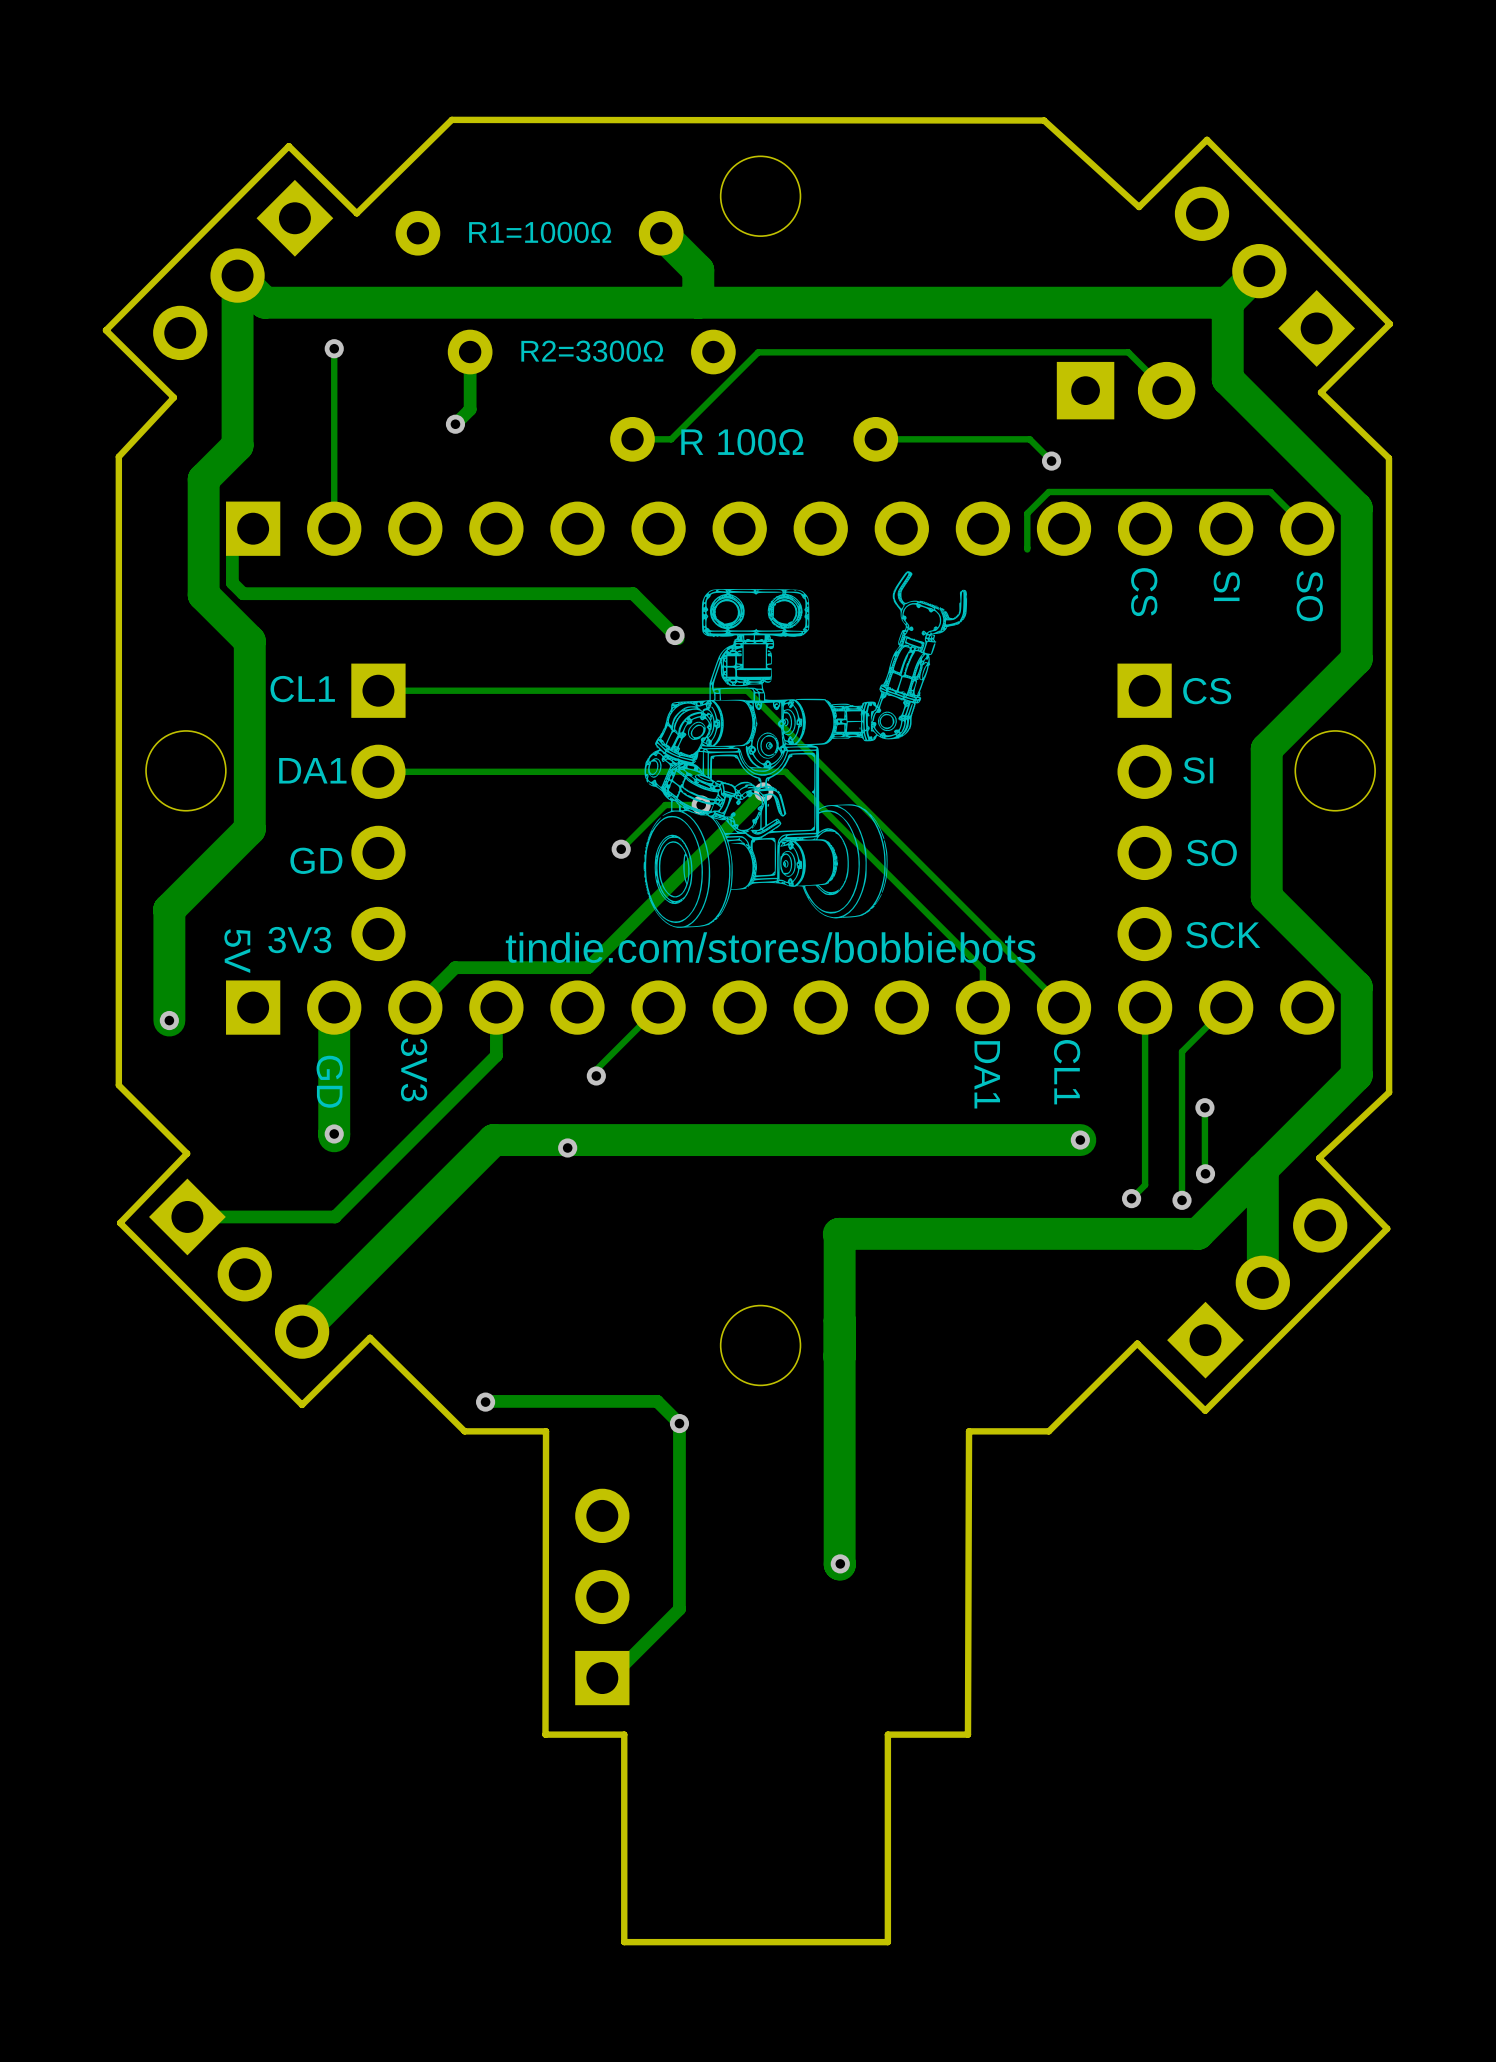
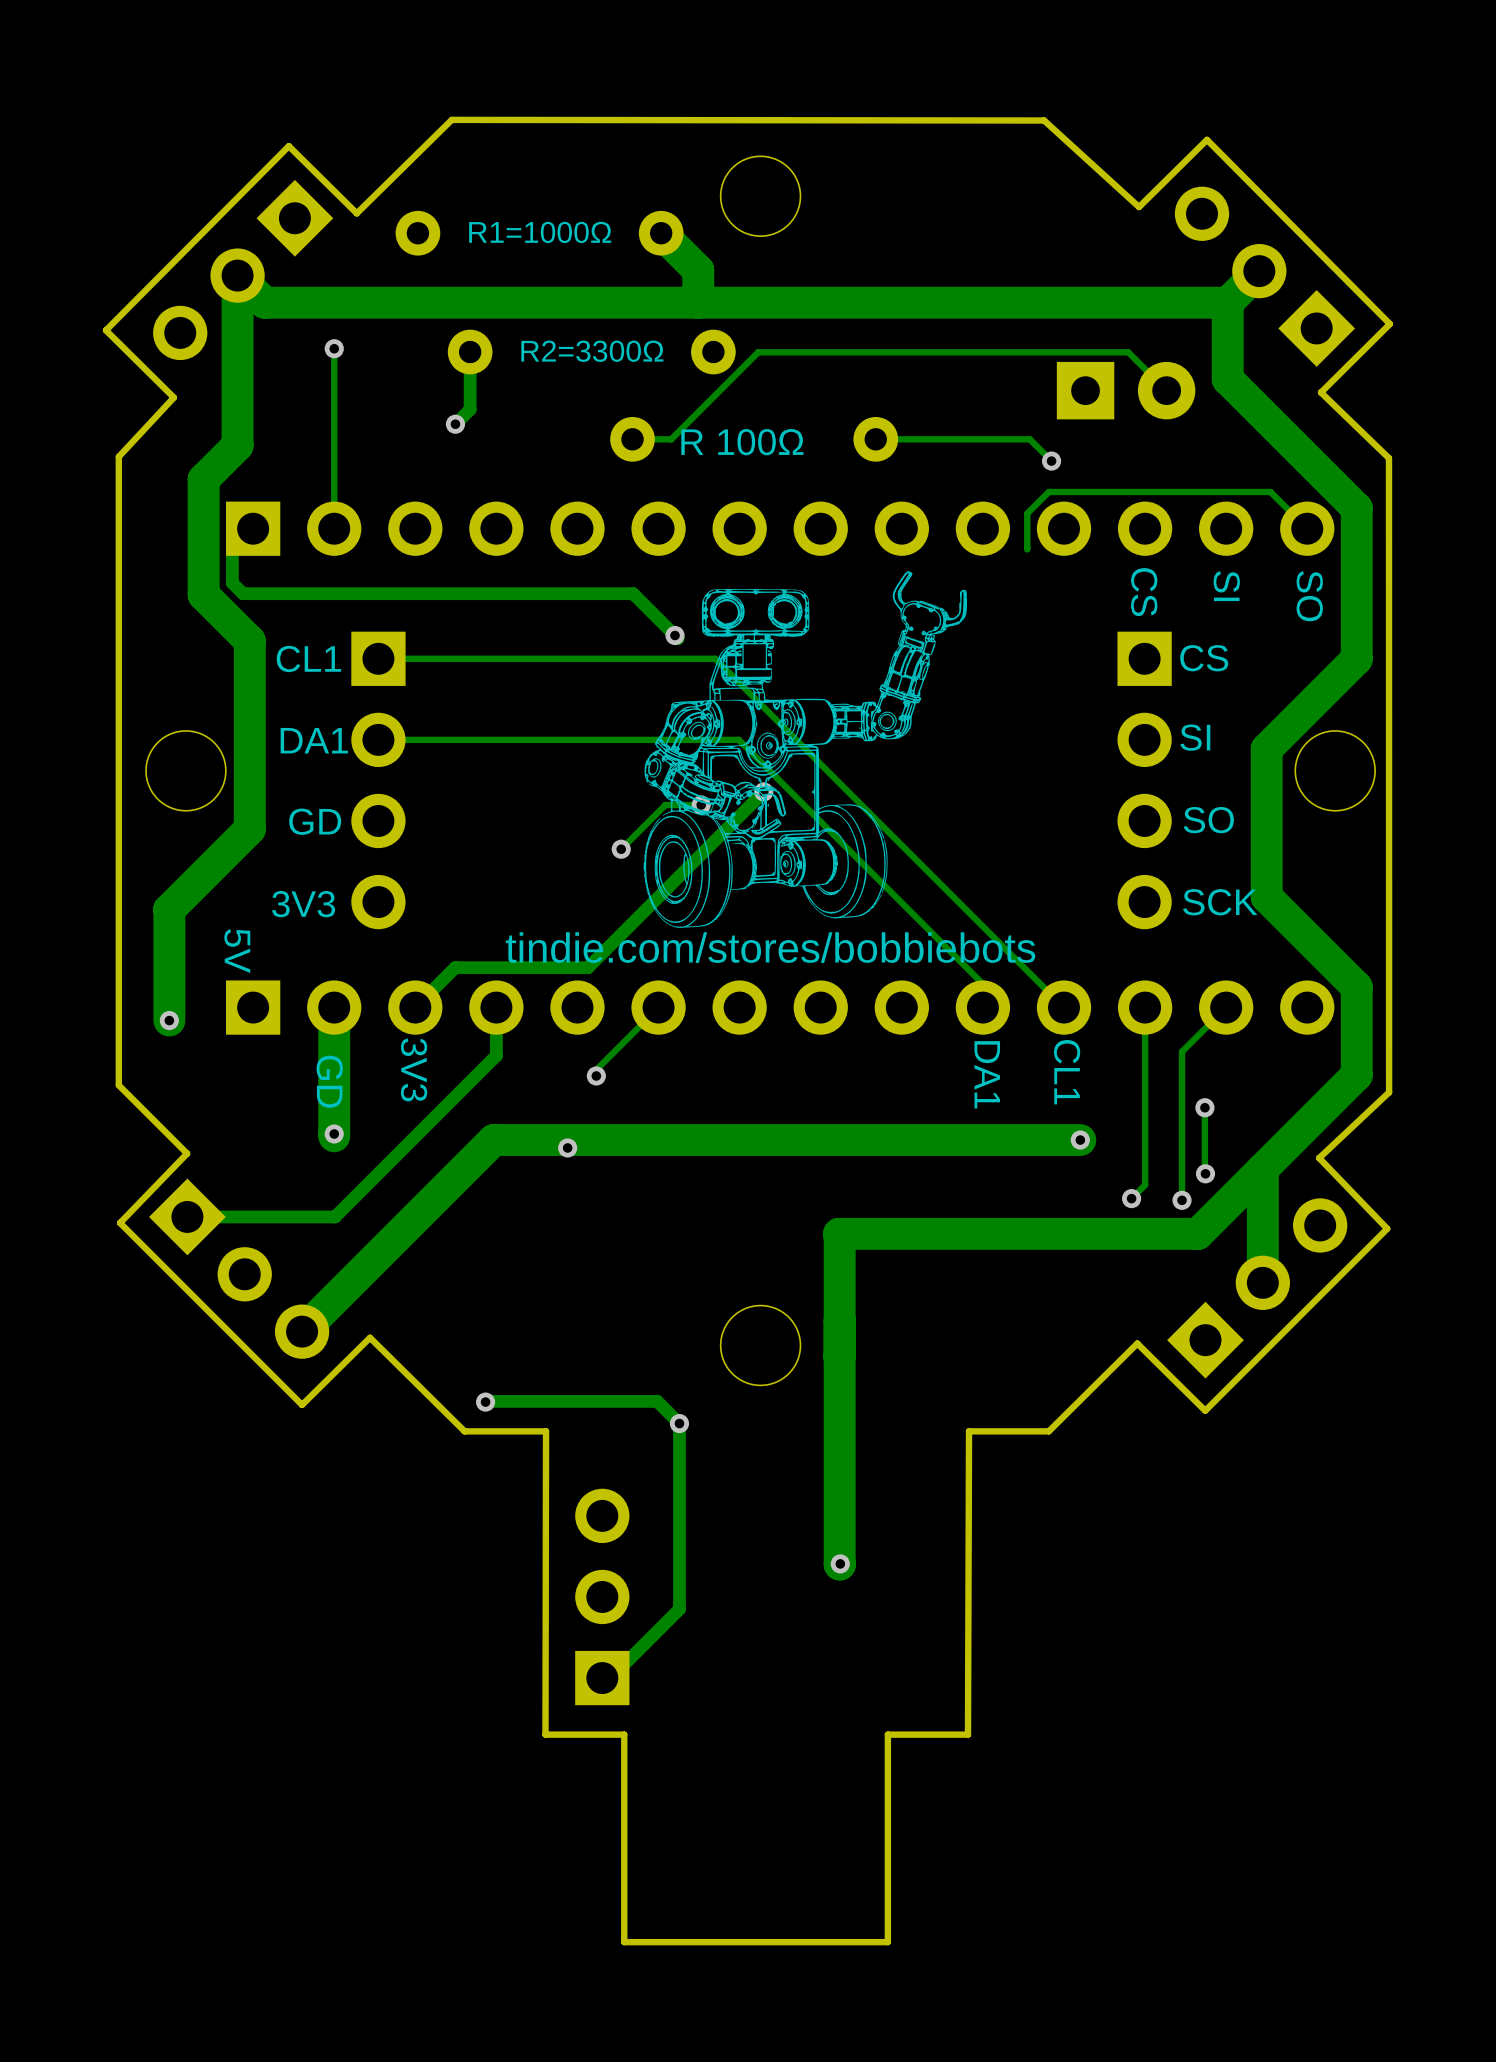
text position: CL1 (302, 689) -> CL1 (308, 658)
track: (747, 690) (378, 690) -> (747, 690) (715, 658) (362, 658)
text position: CS (1207, 691) -> CS (1204, 658)
text position: DA1 (312, 770) -> DA1 (314, 740)
text position: SI (1198, 770) -> SI (1195, 737)
track: (378, 771) (785, 771) (982, 969) (982, 983) -> (362, 739) (738, 739) (982, 983)
part position: (378, 812) -> (378, 780)
part position: (1144, 812) -> (1144, 780)
text position: SO (1211, 852) -> SO (1208, 820)
text position: GD (316, 860) -> GD (315, 821)
text position: SCK (1223, 935) -> SCK (1220, 902)
text position: 3V3 (299, 940) -> 3V3 (303, 904)

